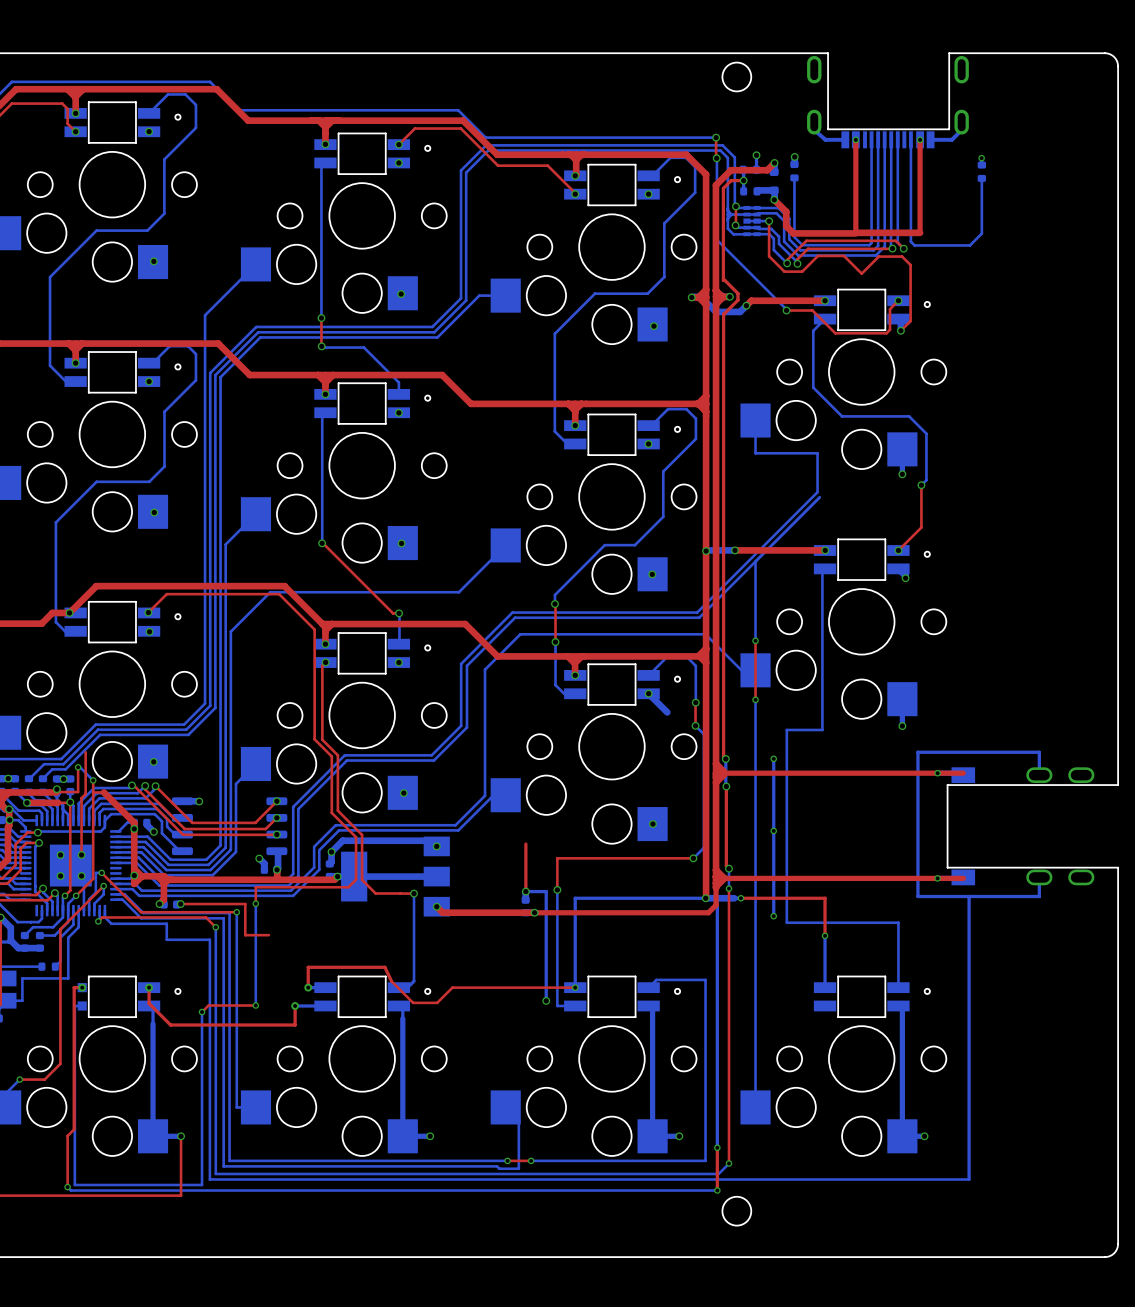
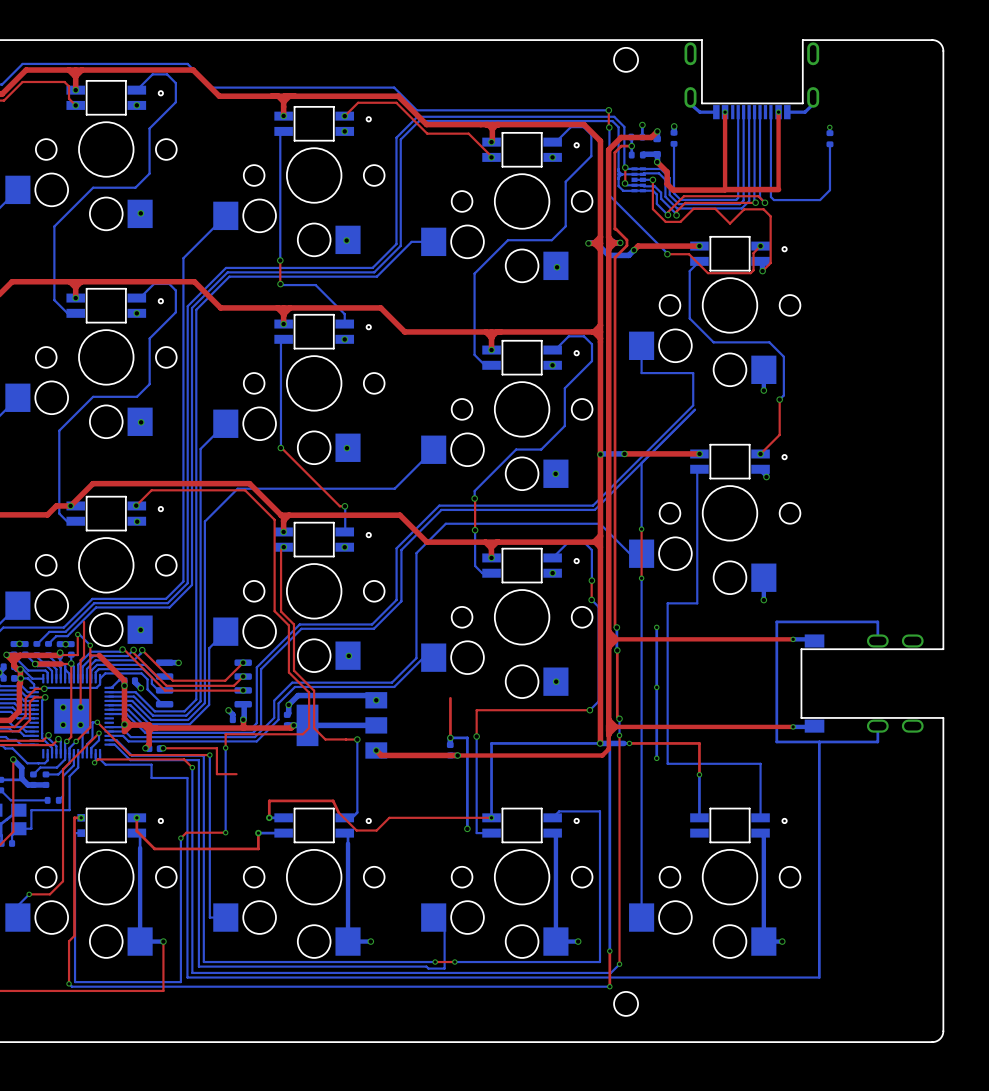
bottom track: (648, 693) (667, 712) -> none
top track: (937, 773) (963, 773) -> none
top track: (937, 878) (963, 878) -> none

